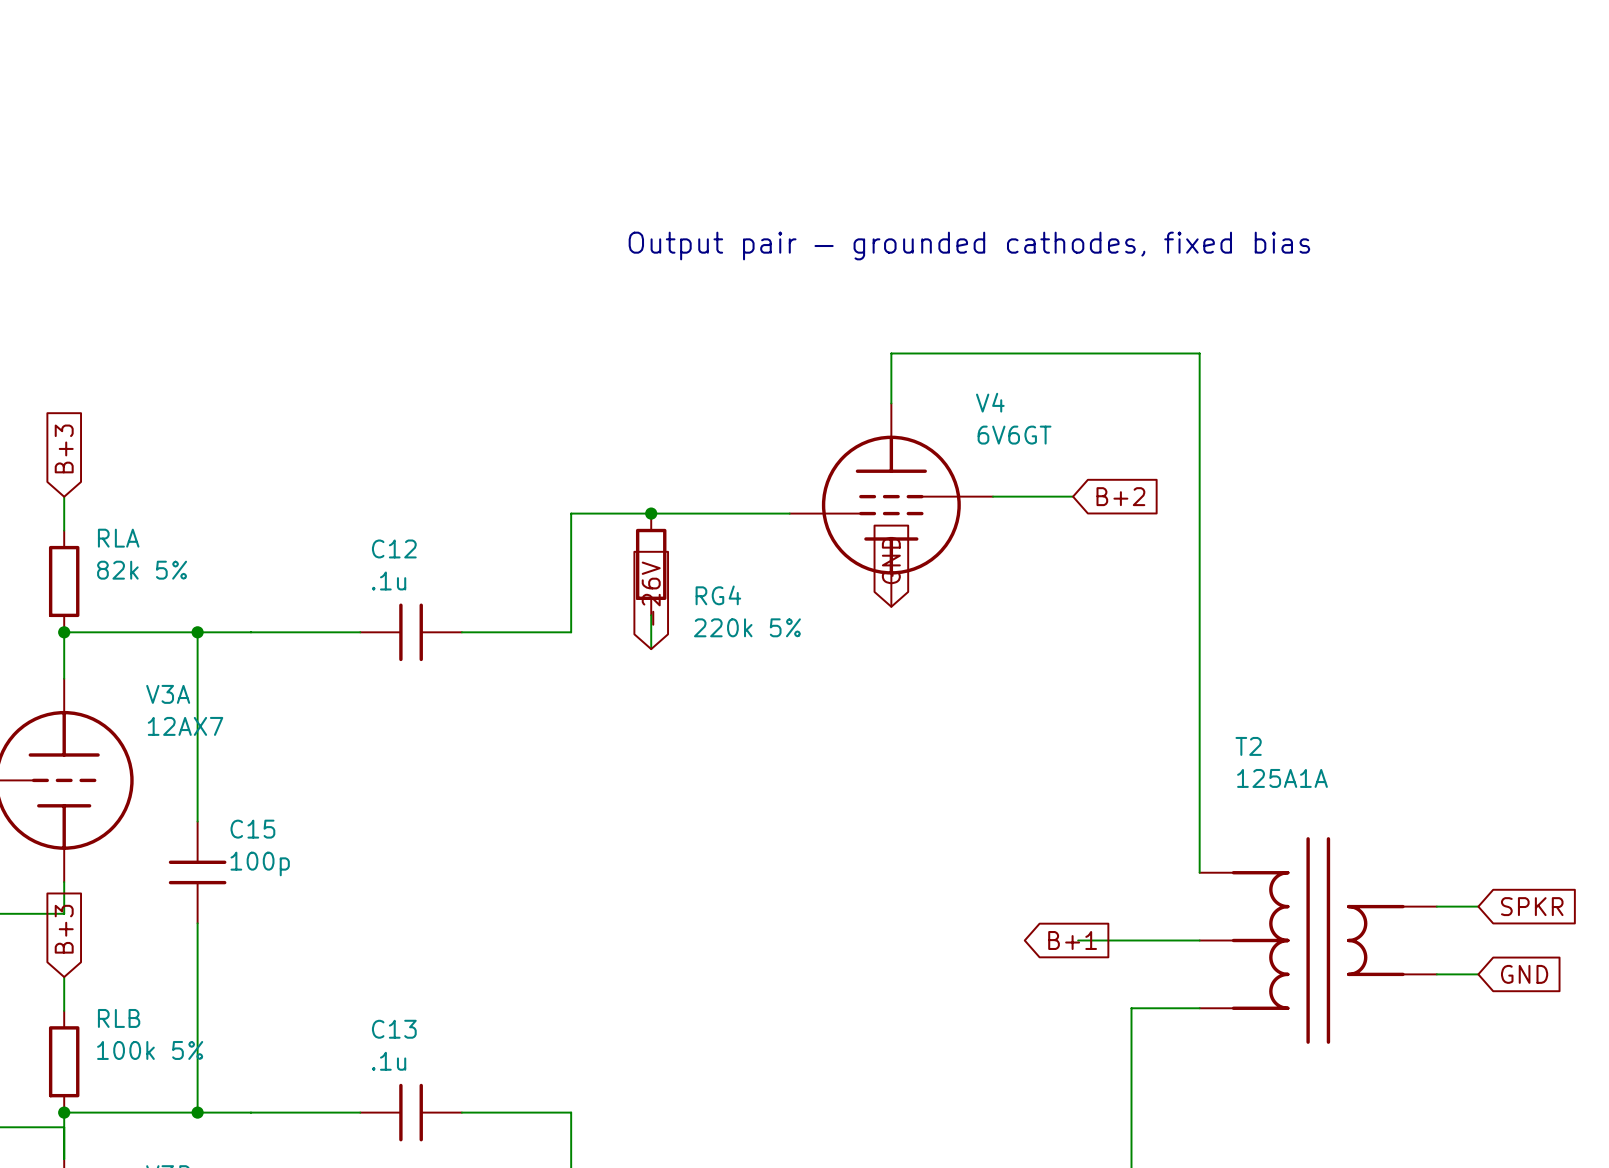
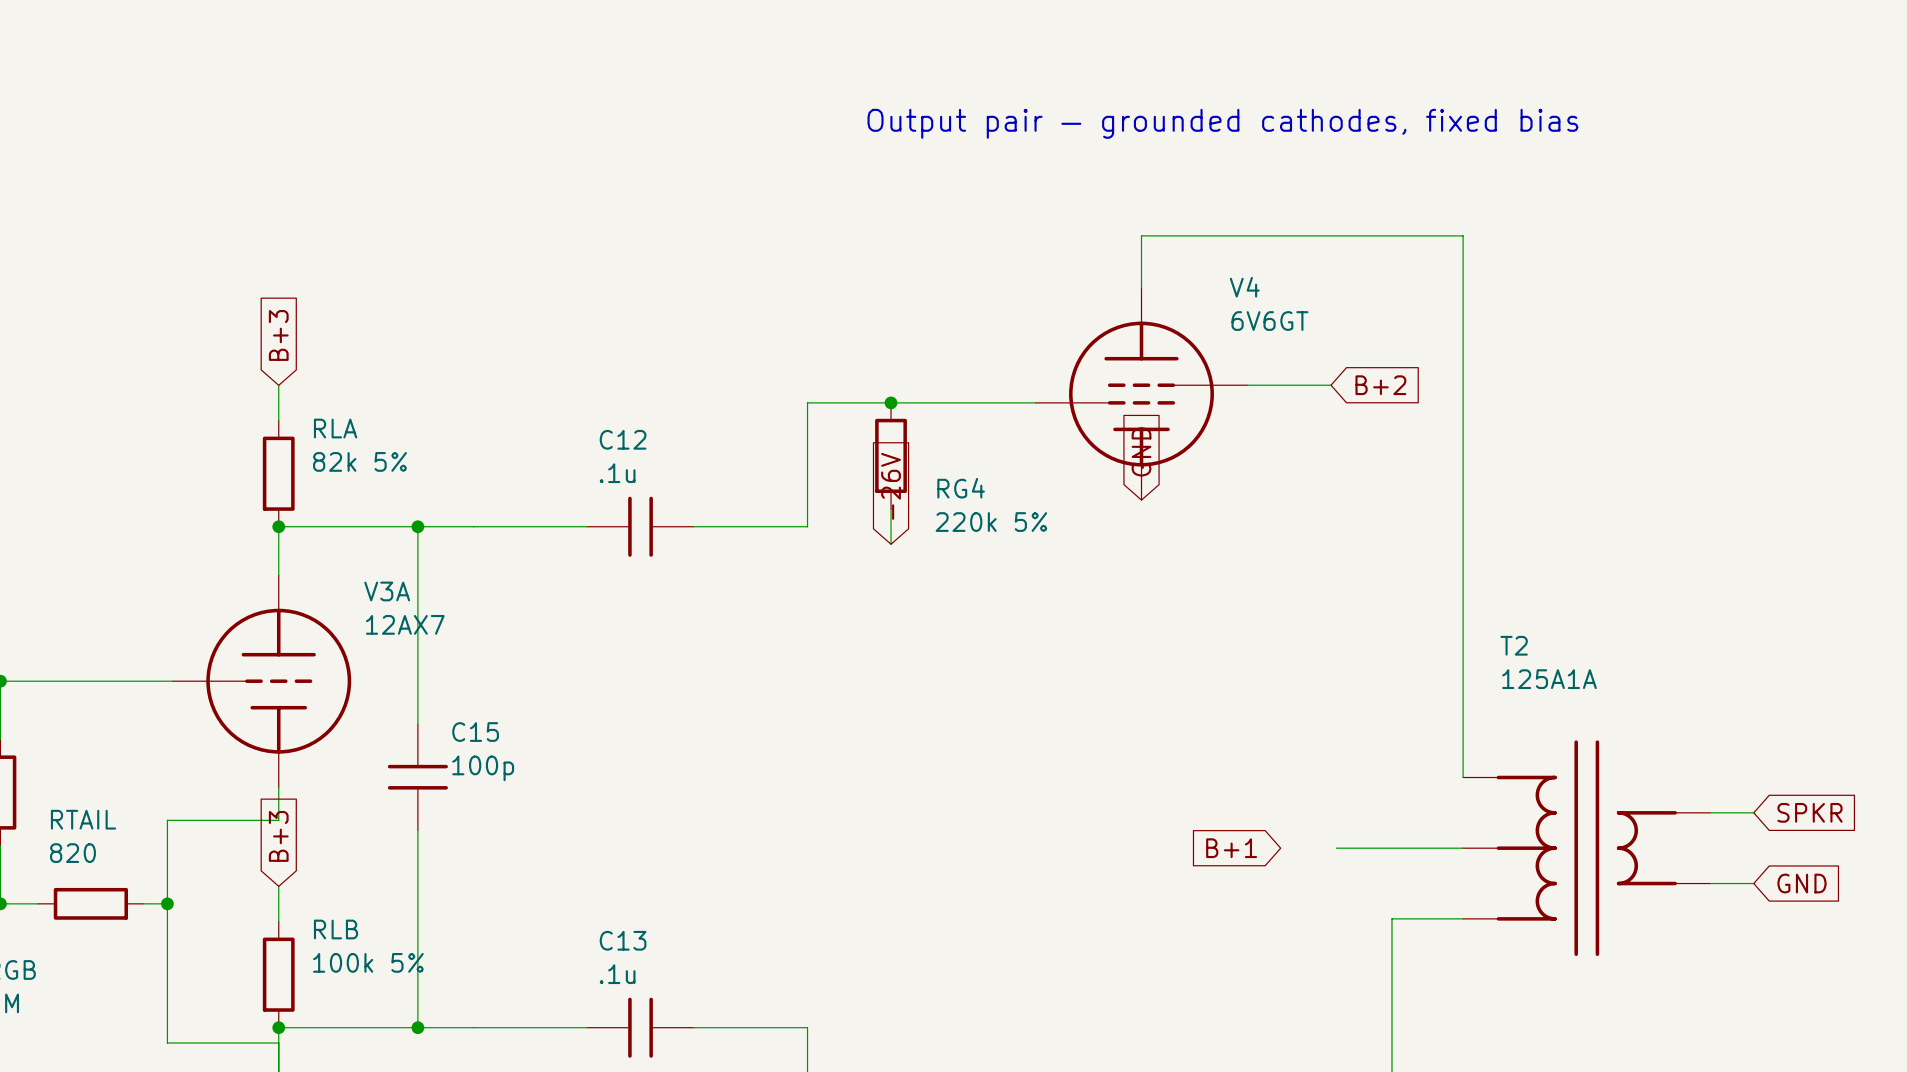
global label rotation: 0° (1072, 940) -> 180° (1231, 848)

